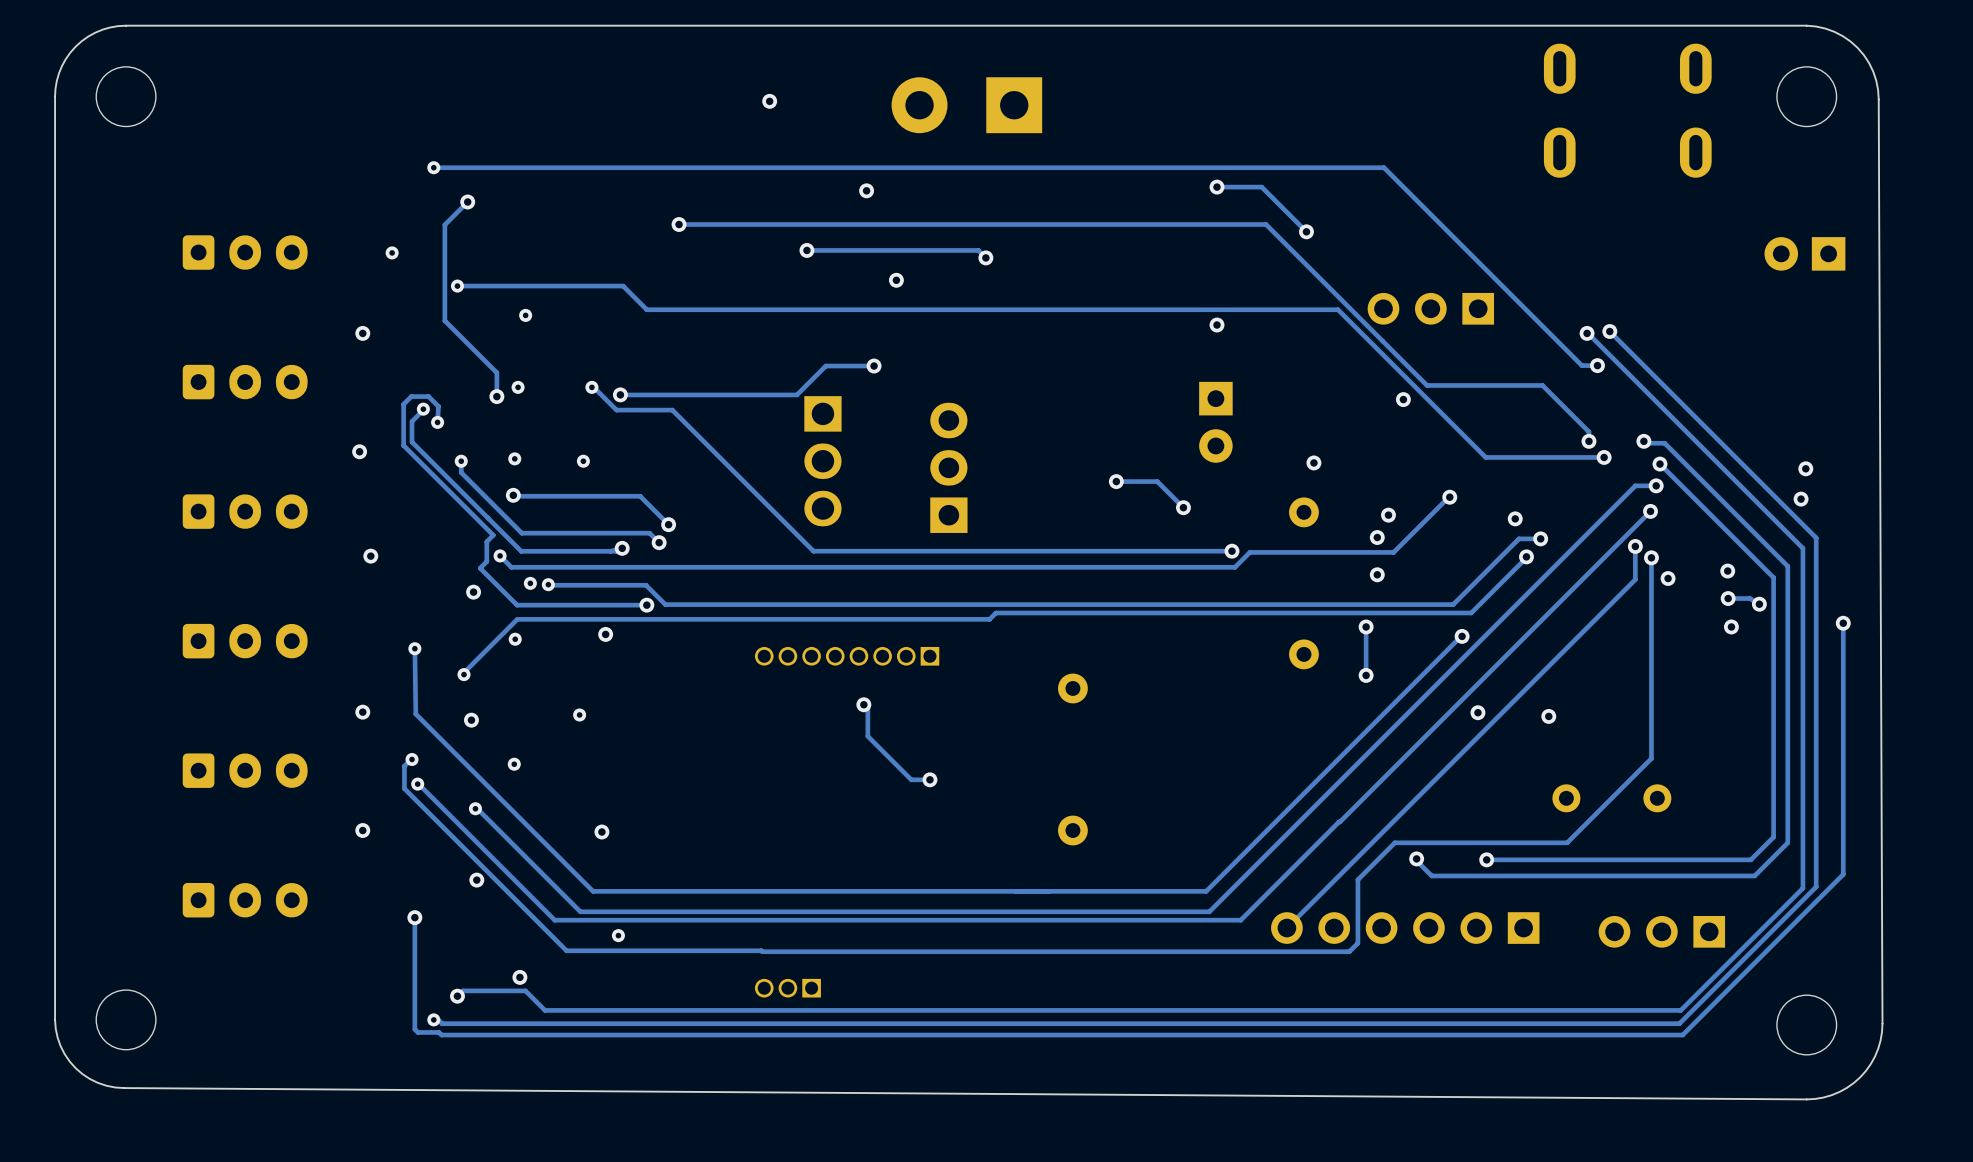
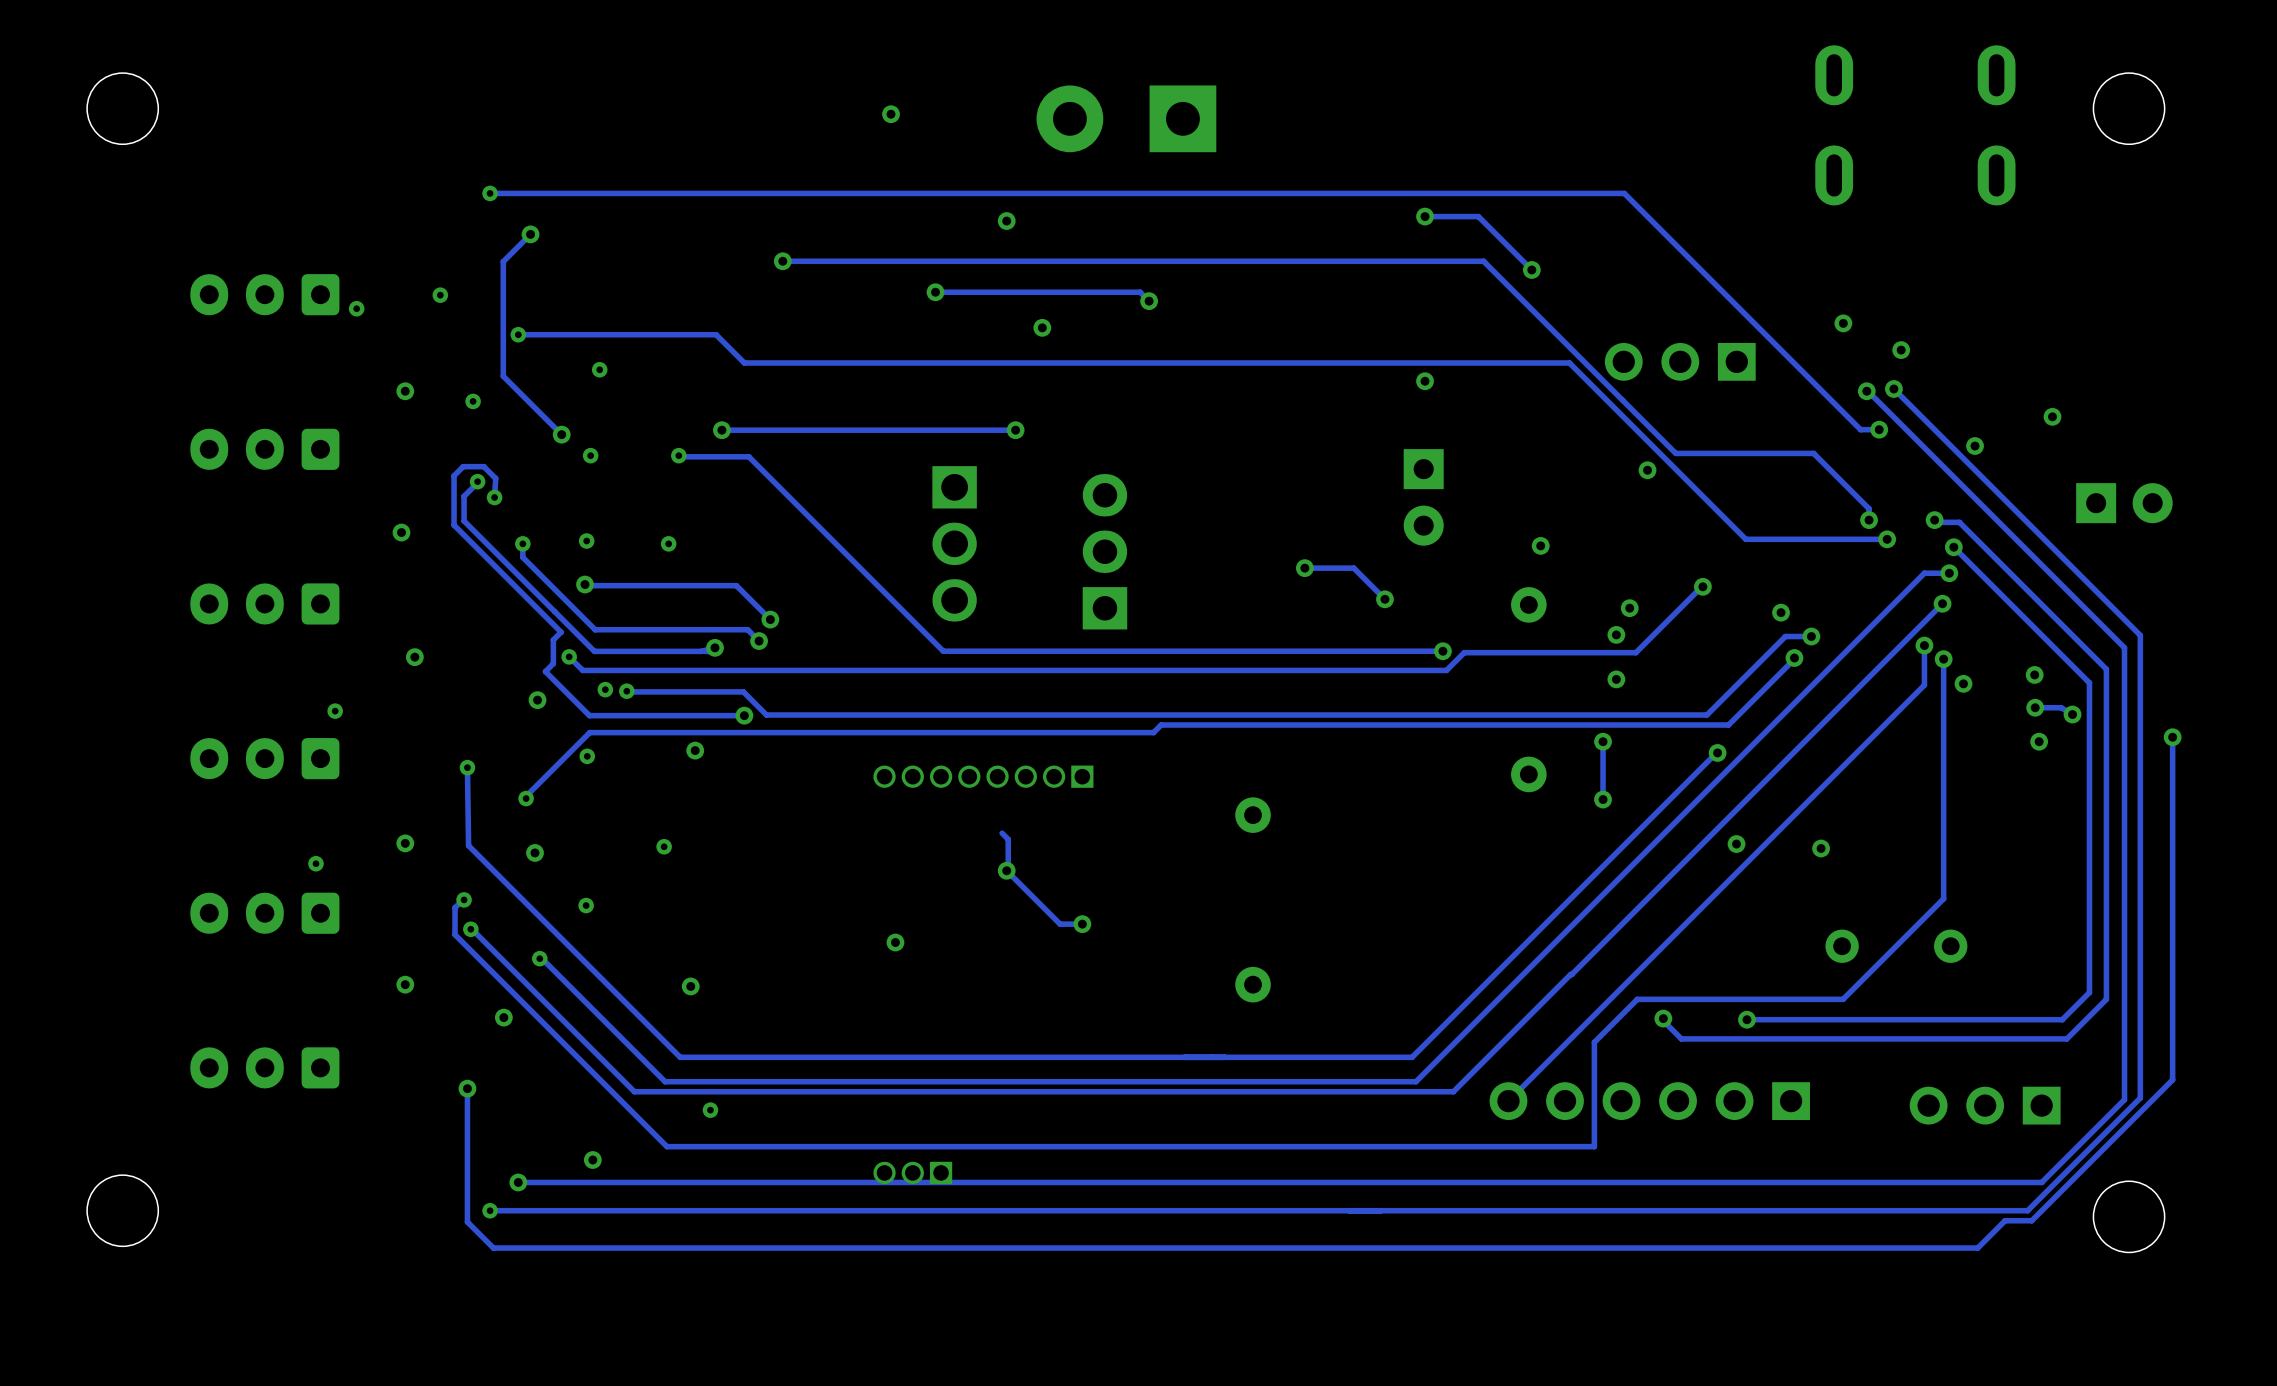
board edge: (1806, 25) (126, 25) (110, 27) (88, 36) (75, 46) (65, 58) (59, 73) (55, 96) (55, 1019) (57, 1037) (64, 1054) (75, 1068) (89, 1078) (106, 1085) (124, 1088) (1806, 1099) (1831, 1095) (1847, 1087) (1860, 1077) (1870, 1063) (1878, 1048) (1882, 1023) (1878, 99) (1873, 71) (1857, 47) (1834, 31) (1806, 25) -> none
part rotation: 0° (245, 252) -> 180° (264, 294)
part rotation: 0° (1804, 253) -> 180° (2124, 503)
part position: (1804, 253) -> (2124, 503)
via: none -> (356, 308)
via: none -> (1843, 323)
via: none -> (1901, 350)
via: none -> (473, 401)
via: none -> (2052, 416)
track: (825, 366) (796, 394) (620, 394) -> (958, 430) (721, 430)
track: (493, 369) (496, 372) (496, 396) -> none
via: none -> (1975, 446)
part rotation: 0° (245, 382) -> 180° (264, 449)
track: (594, 388) (616, 410) (672, 410) -> (682, 456) (748, 456) (774, 482)
via position: (620, 394) -> (721, 430)
via position: (496, 396) -> (561, 434)
via: (1805, 468) -> none
via: (1801, 499) -> none
part rotation: 0° (245, 511) -> 180° (264, 603)
via: none -> (335, 711)
part rotation: 0° (245, 641) -> 180° (264, 758)
via position: (863, 704) -> (1006, 870)
via: none -> (315, 863)
part rotation: 0° (245, 770) -> 180° (264, 913)
via: none -> (895, 942)
track: (1843, 874) (1682, 1035) (441, 1035) (439, 1032) (417, 1032) -> (2172, 1037) (2172, 1079) (2031, 1220) (2005, 1220) (1977, 1248) (493, 1248) (471, 1225)
track: (1358, 878) (1357, 943) (1349, 951) (566, 950) -> (1594, 1042) (1594, 1146) (666, 1146) (648, 1128)
via position: (476, 880) -> (503, 1017)
track: (1816, 886) (1679, 1023) (442, 1023) (438, 1019) -> (2140, 1051) (2140, 1098) (2027, 1210) (495, 1210)
track: (1802, 888) (1680, 1010) (545, 1010) (525, 990) (462, 990) (457, 996) -> (2124, 1053) (2124, 1099) (2041, 1182) (518, 1182)
part rotation: 0° (245, 900) -> 180° (264, 1067)
part position: (1661, 931) -> (1985, 1105)

